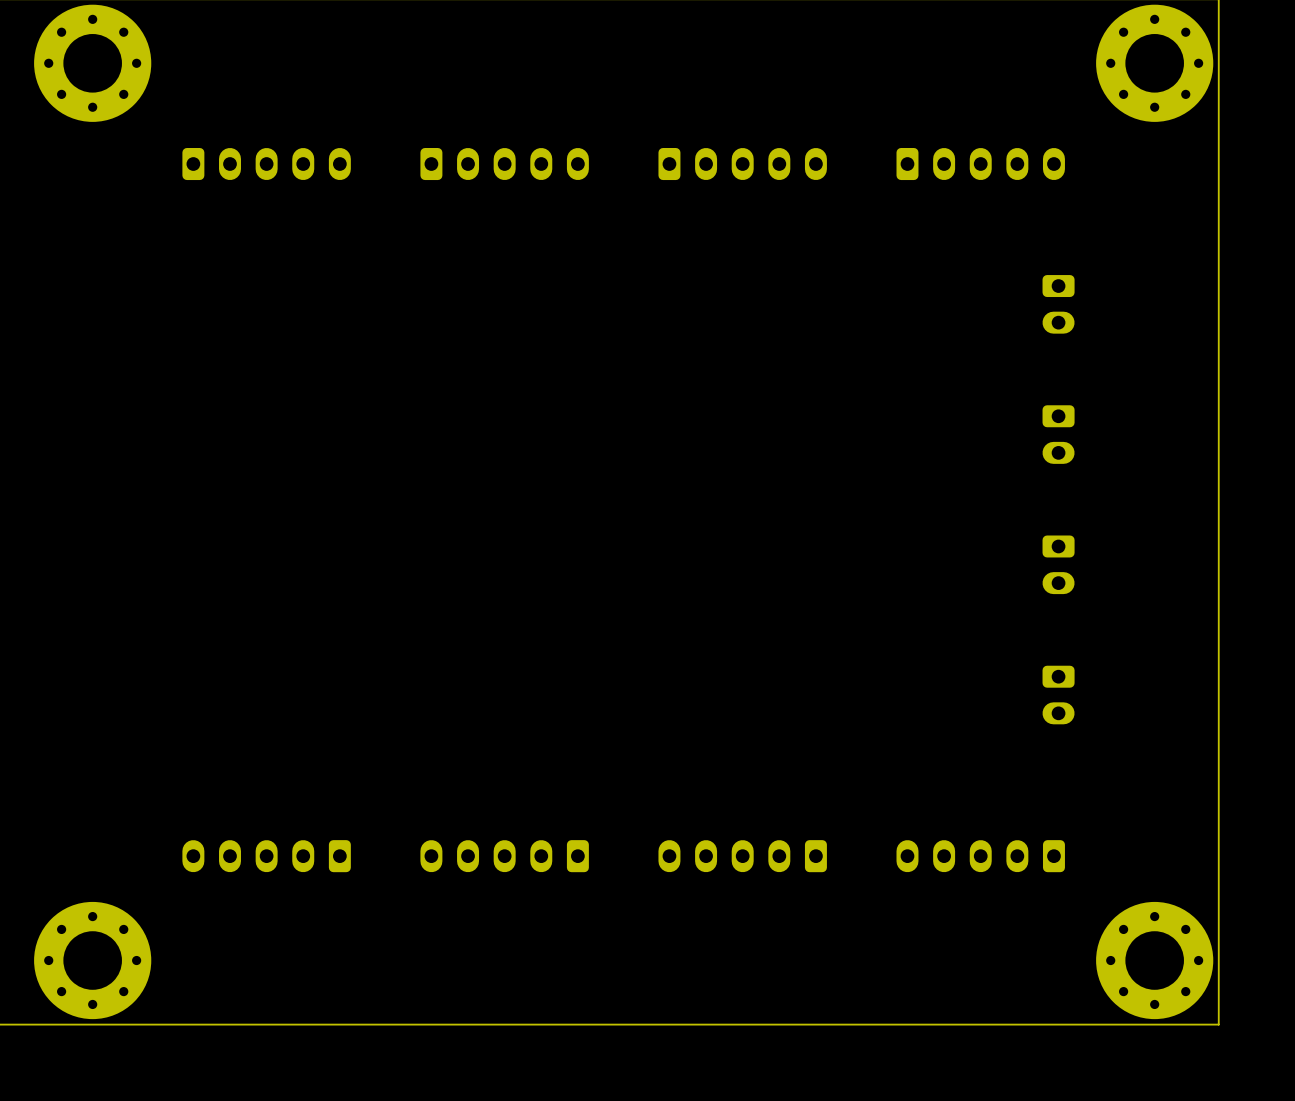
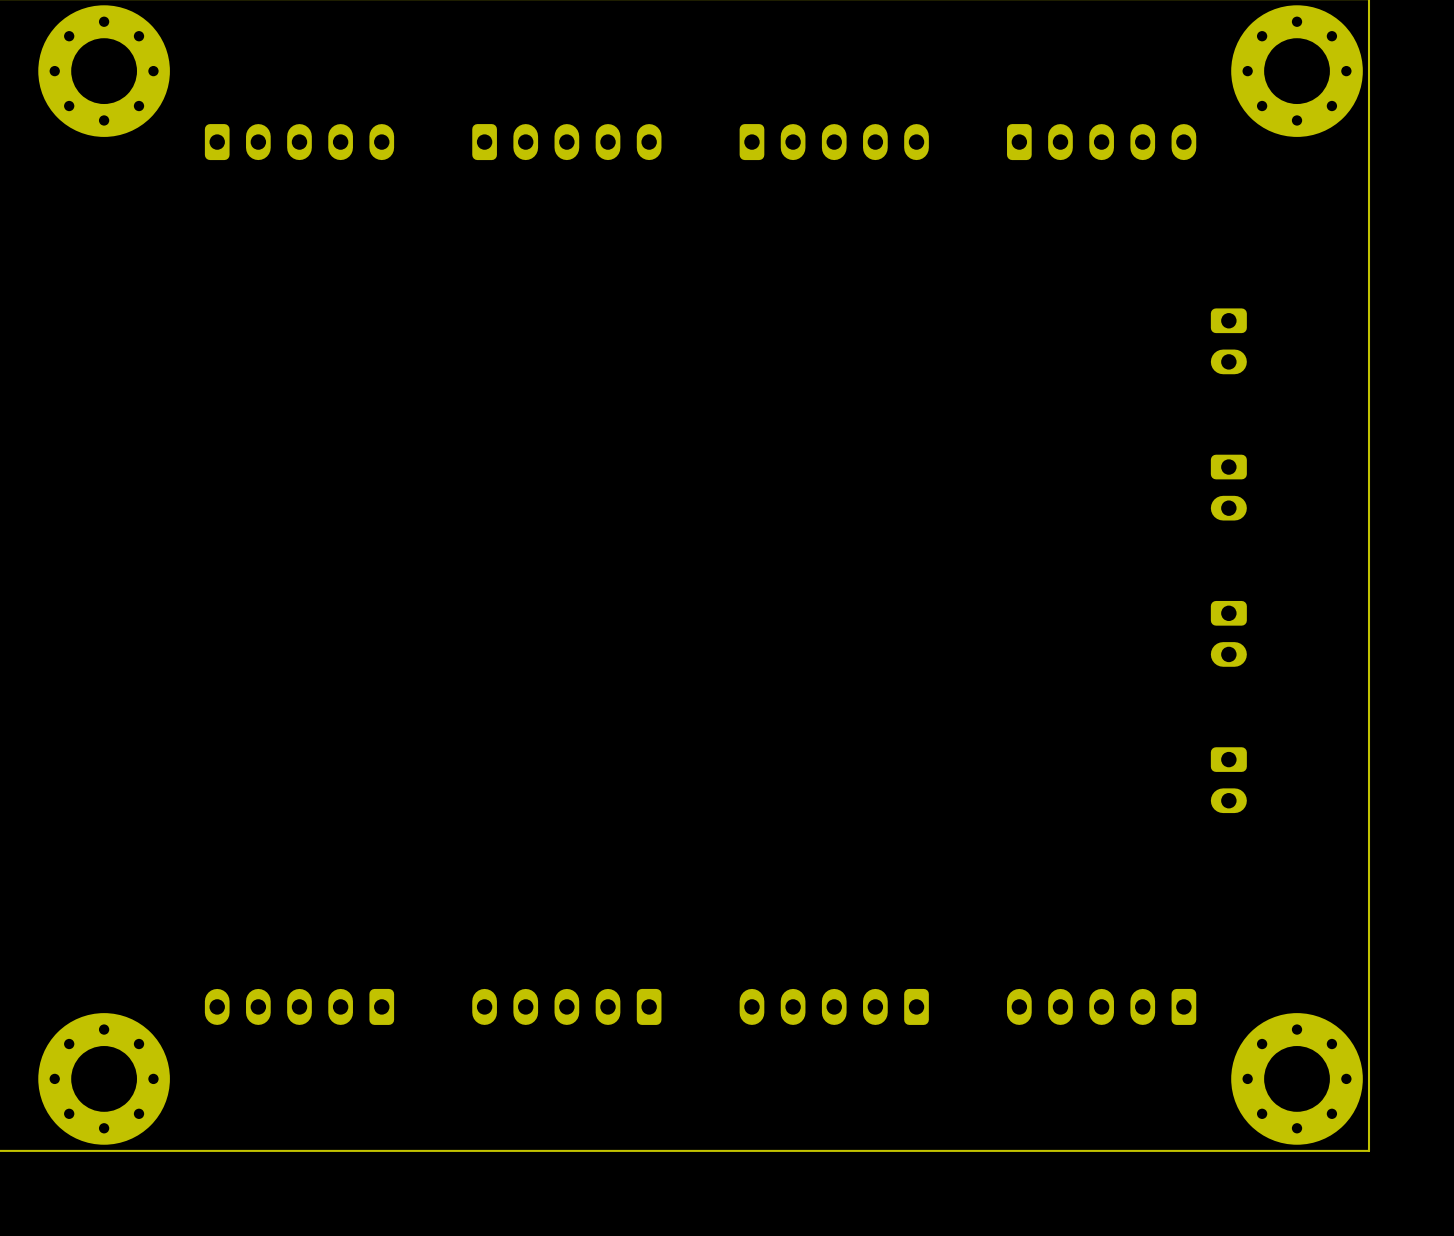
part position: (266, 164) -> (299, 142)
part position: (504, 164) -> (566, 142)
part position: (742, 164) -> (834, 142)
part position: (980, 164) -> (1101, 142)
part position: (1058, 304) -> (1228, 341)
part position: (1058, 434) -> (1228, 487)
part position: (1058, 564) -> (1228, 633)
part position: (1058, 695) -> (1228, 780)
part position: (266, 856) -> (299, 1006)
part position: (504, 856) -> (566, 1006)
part position: (742, 856) -> (834, 1006)
part position: (980, 856) -> (1101, 1006)

